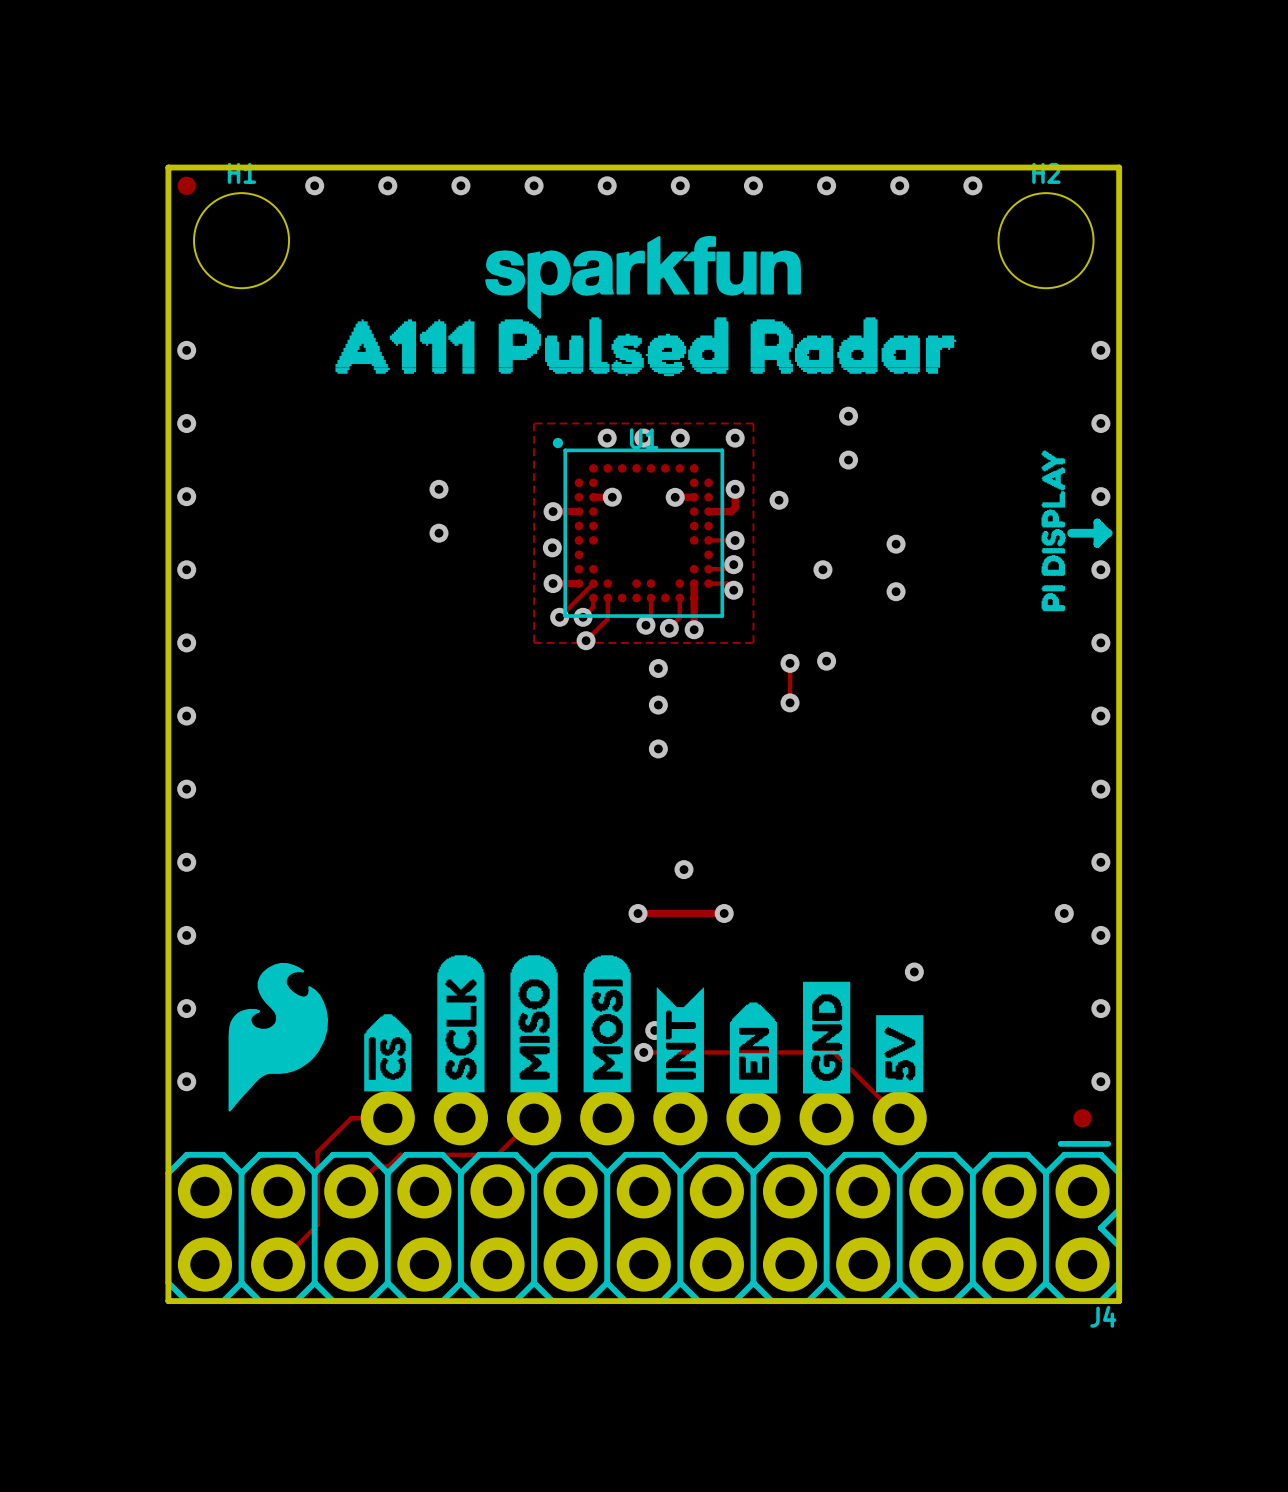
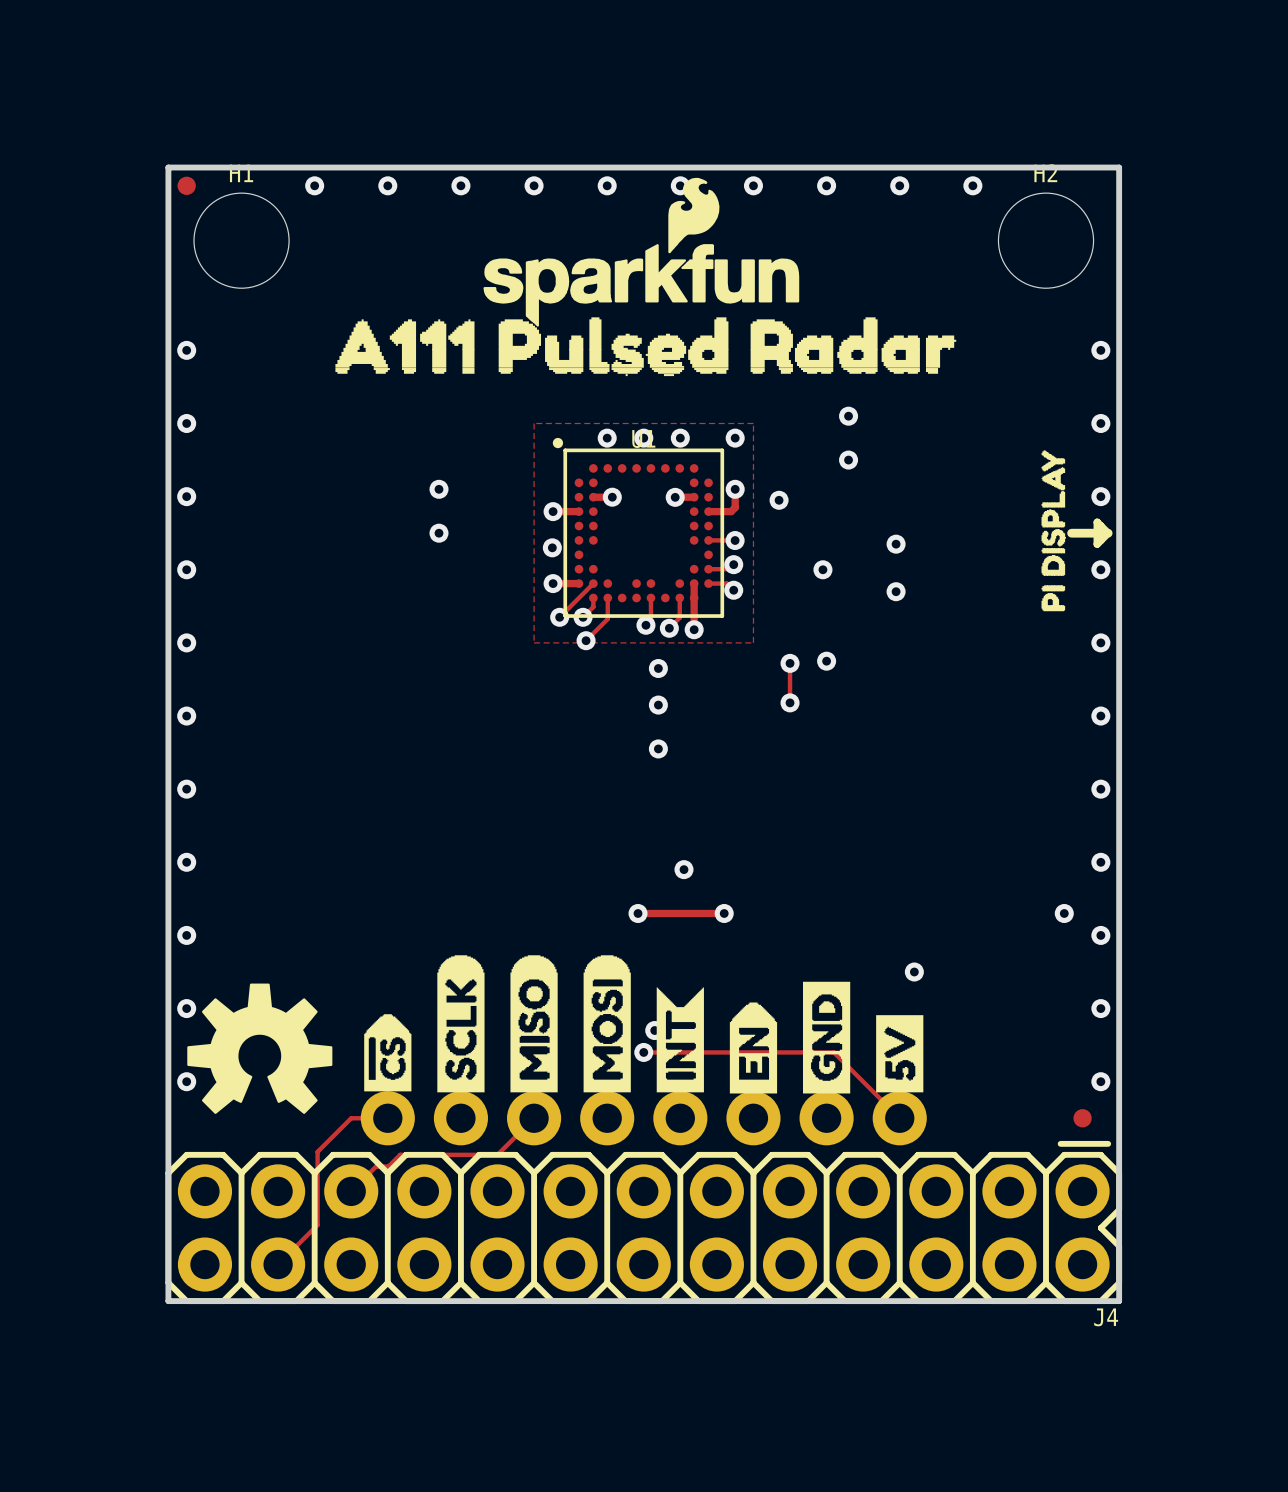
drawing shape: [485, 235, 801, 319] -> [483, 177, 800, 327]
drawing shape: [228, 962, 329, 1112] -> [187, 983, 333, 1114]

